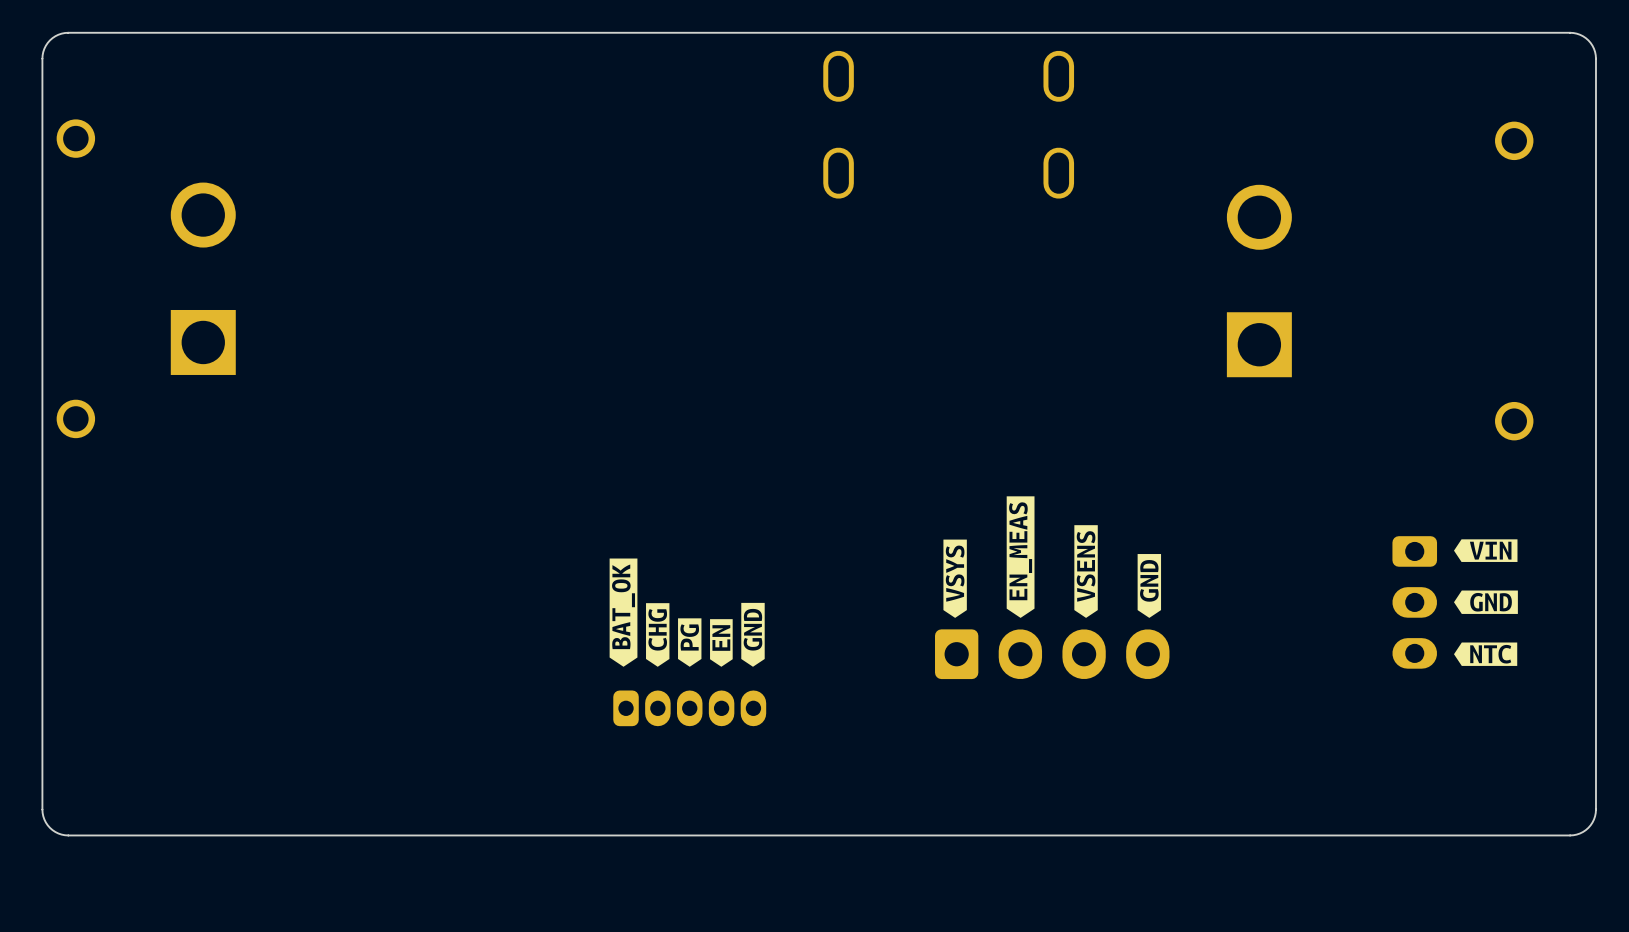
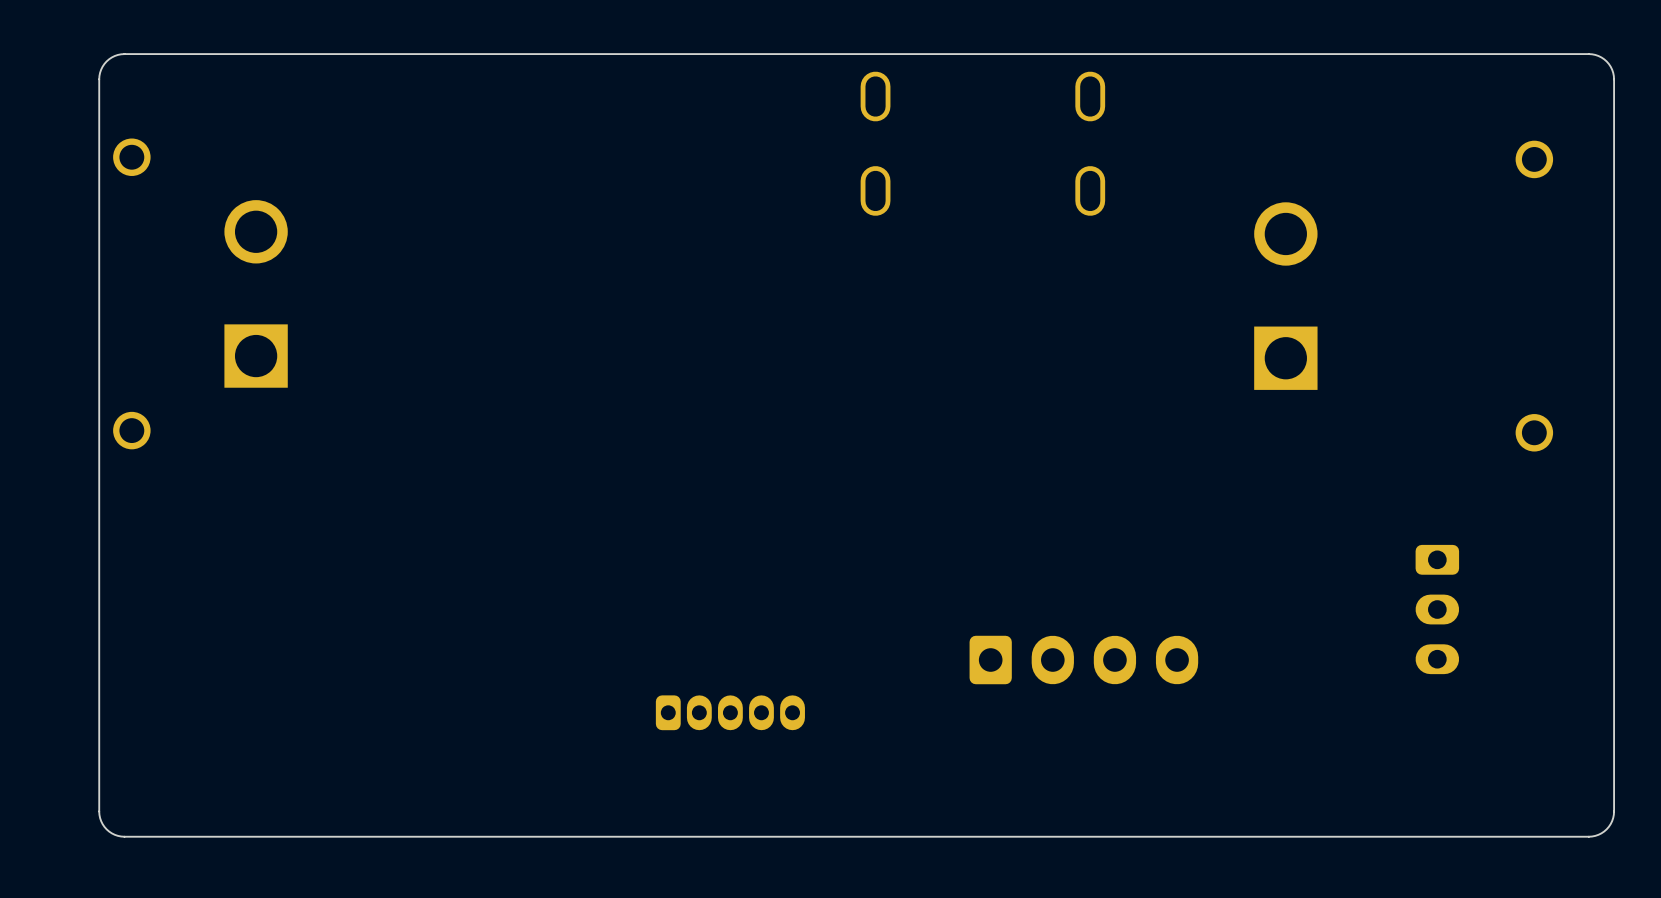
drawing: [1006, 496, 1035, 618] -> none
drawing: [1074, 525, 1098, 618] -> none
drawing: [943, 539, 967, 618] -> none
drawing: [1453, 539, 1518, 666] -> none
drawing: [1137, 554, 1162, 618] -> none
drawing: [609, 558, 765, 667] -> none

